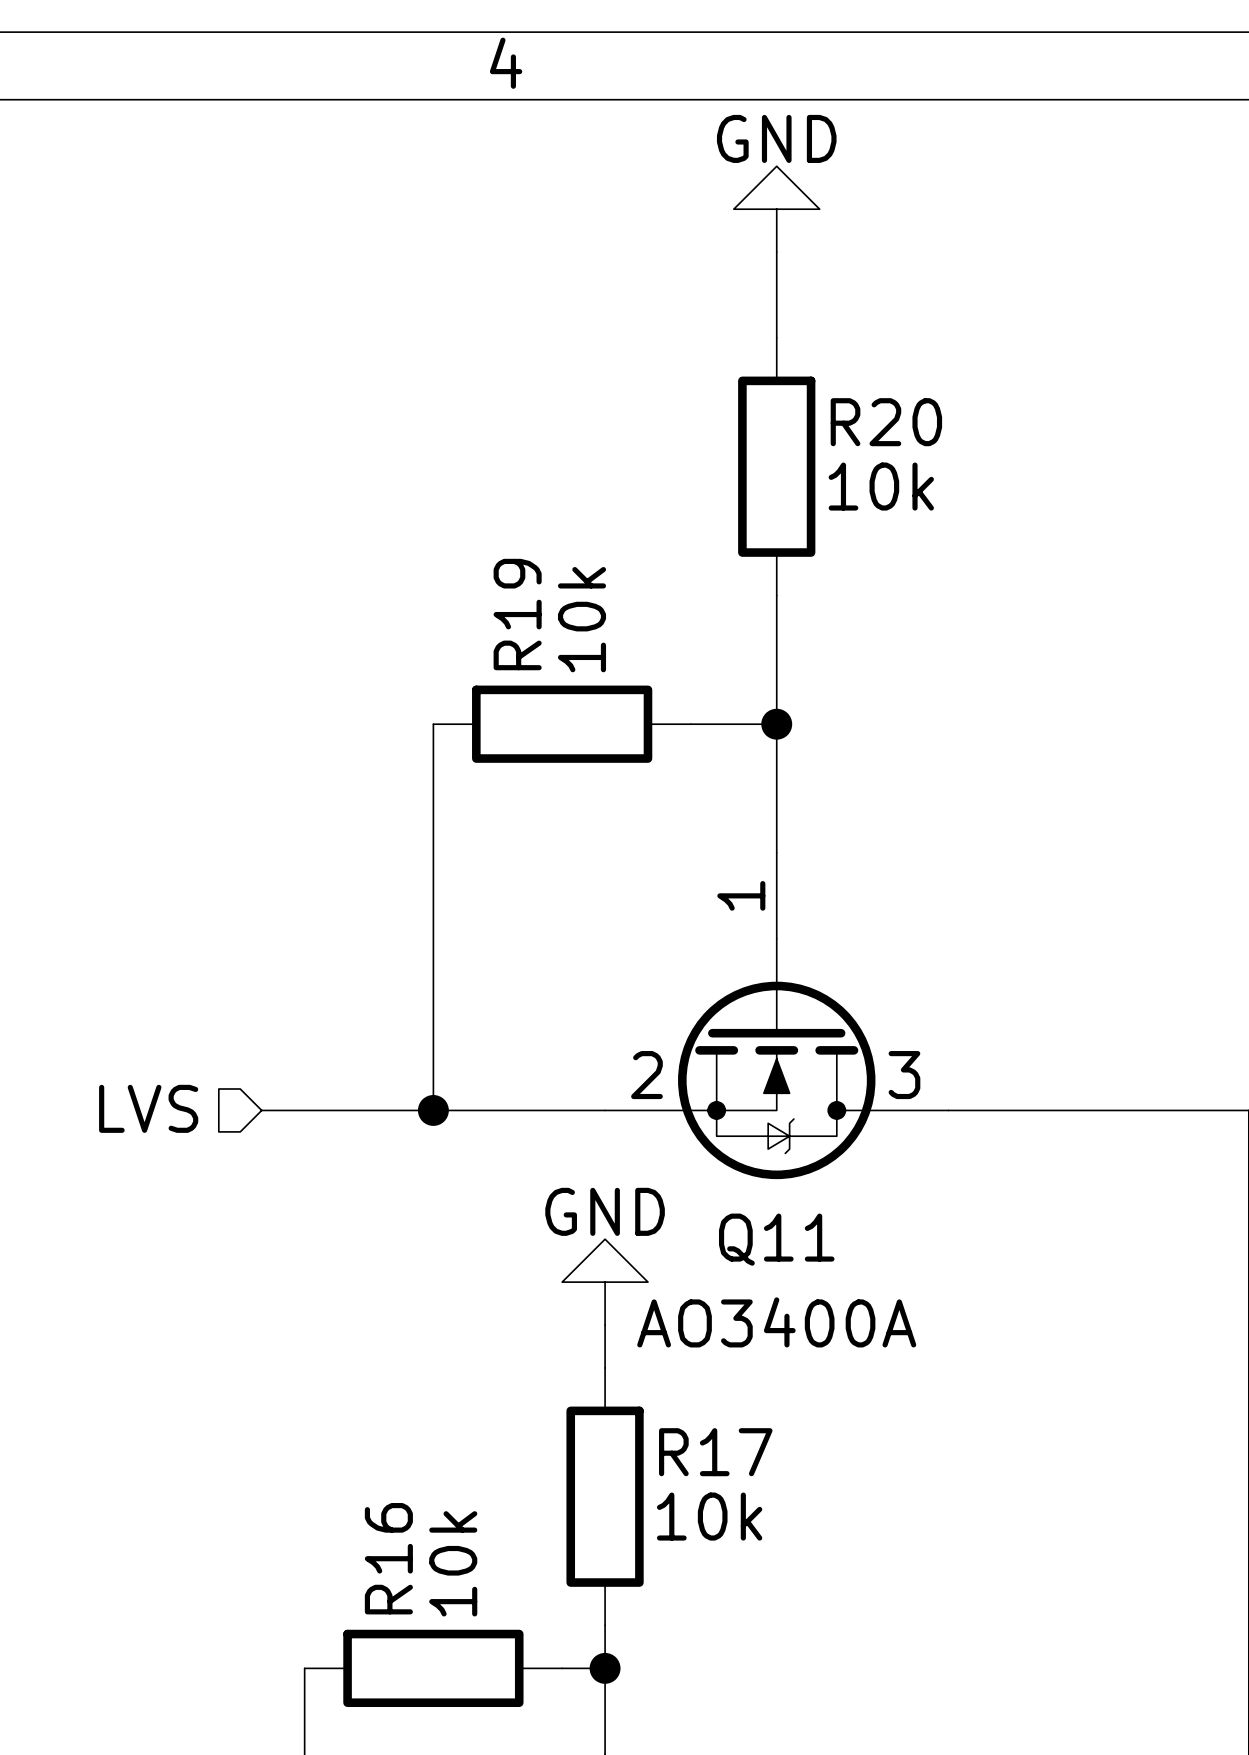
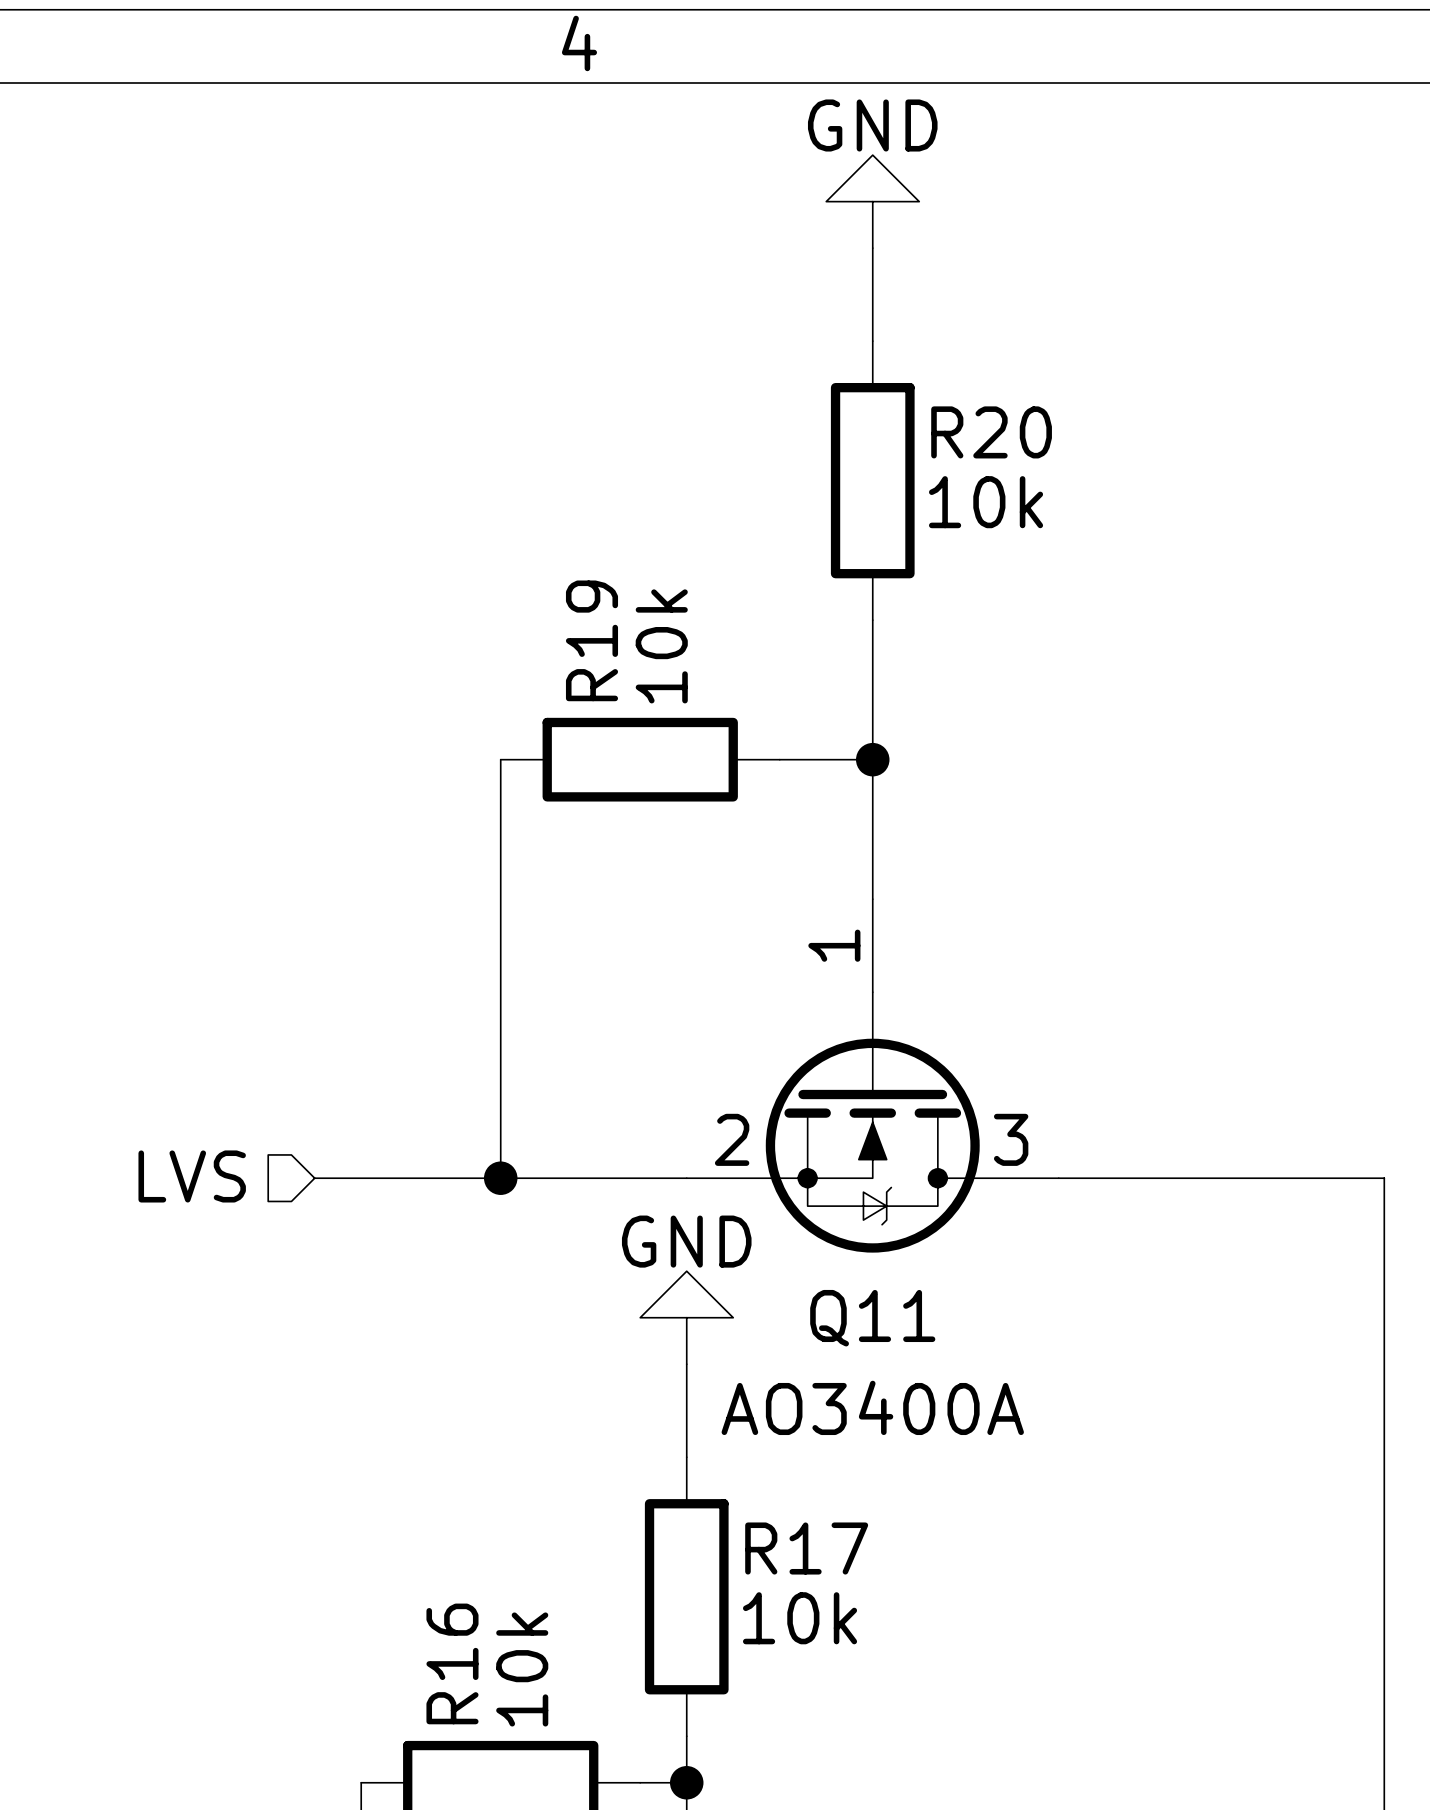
power symbol position: GND (605, 1282) -> GND (686, 1317)

